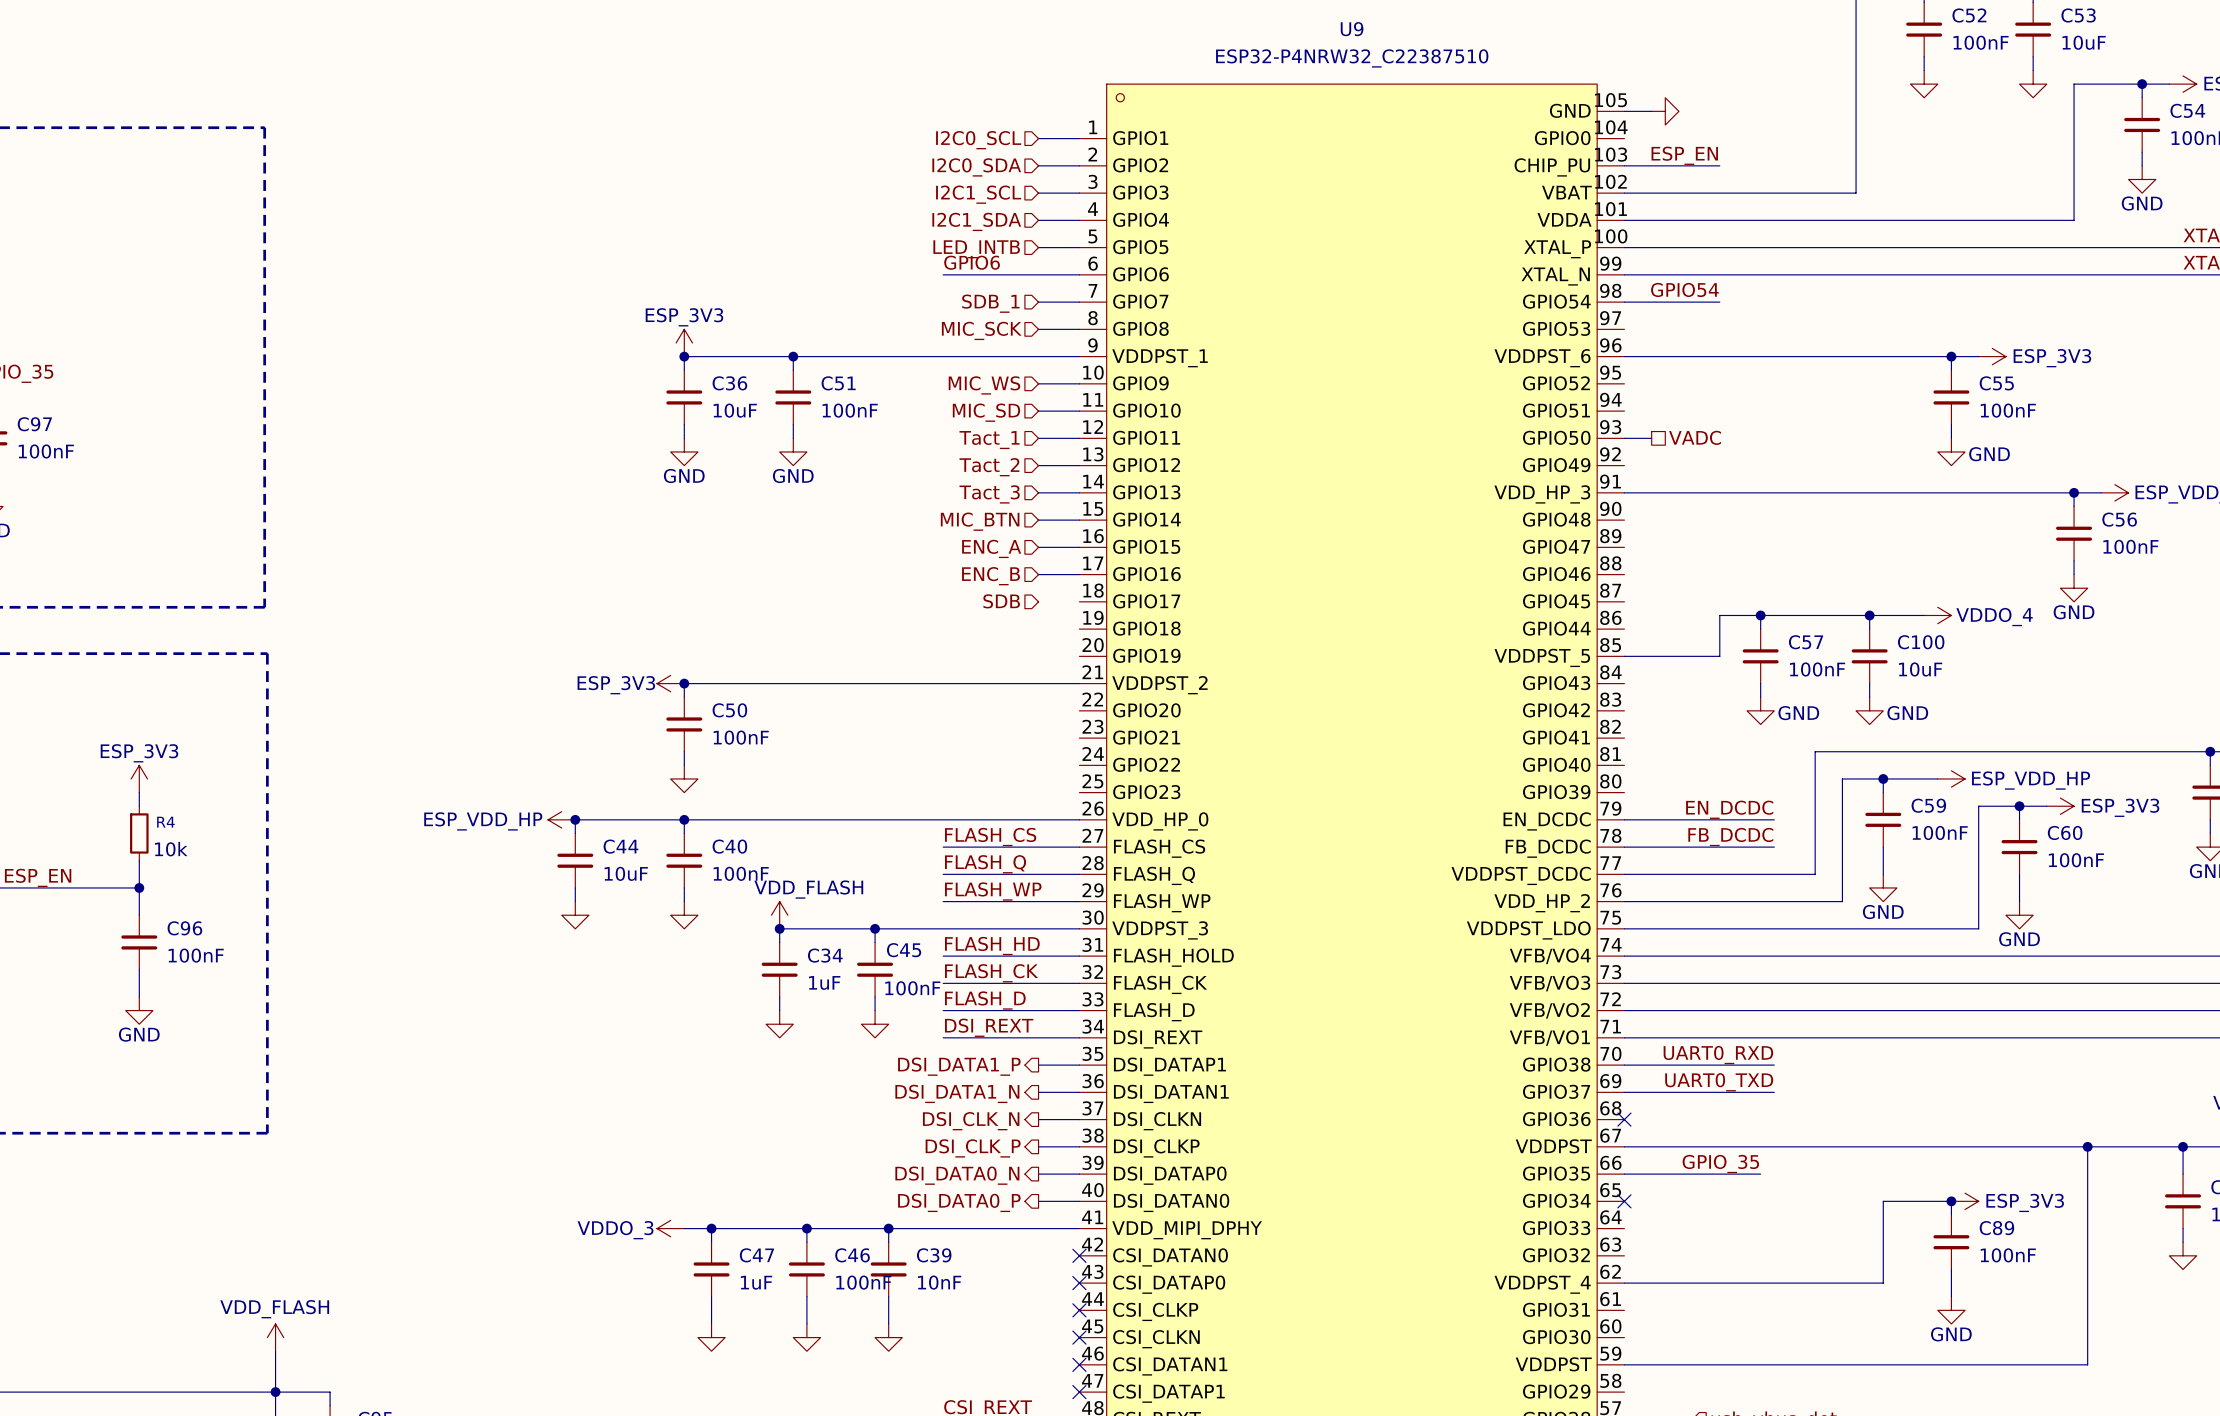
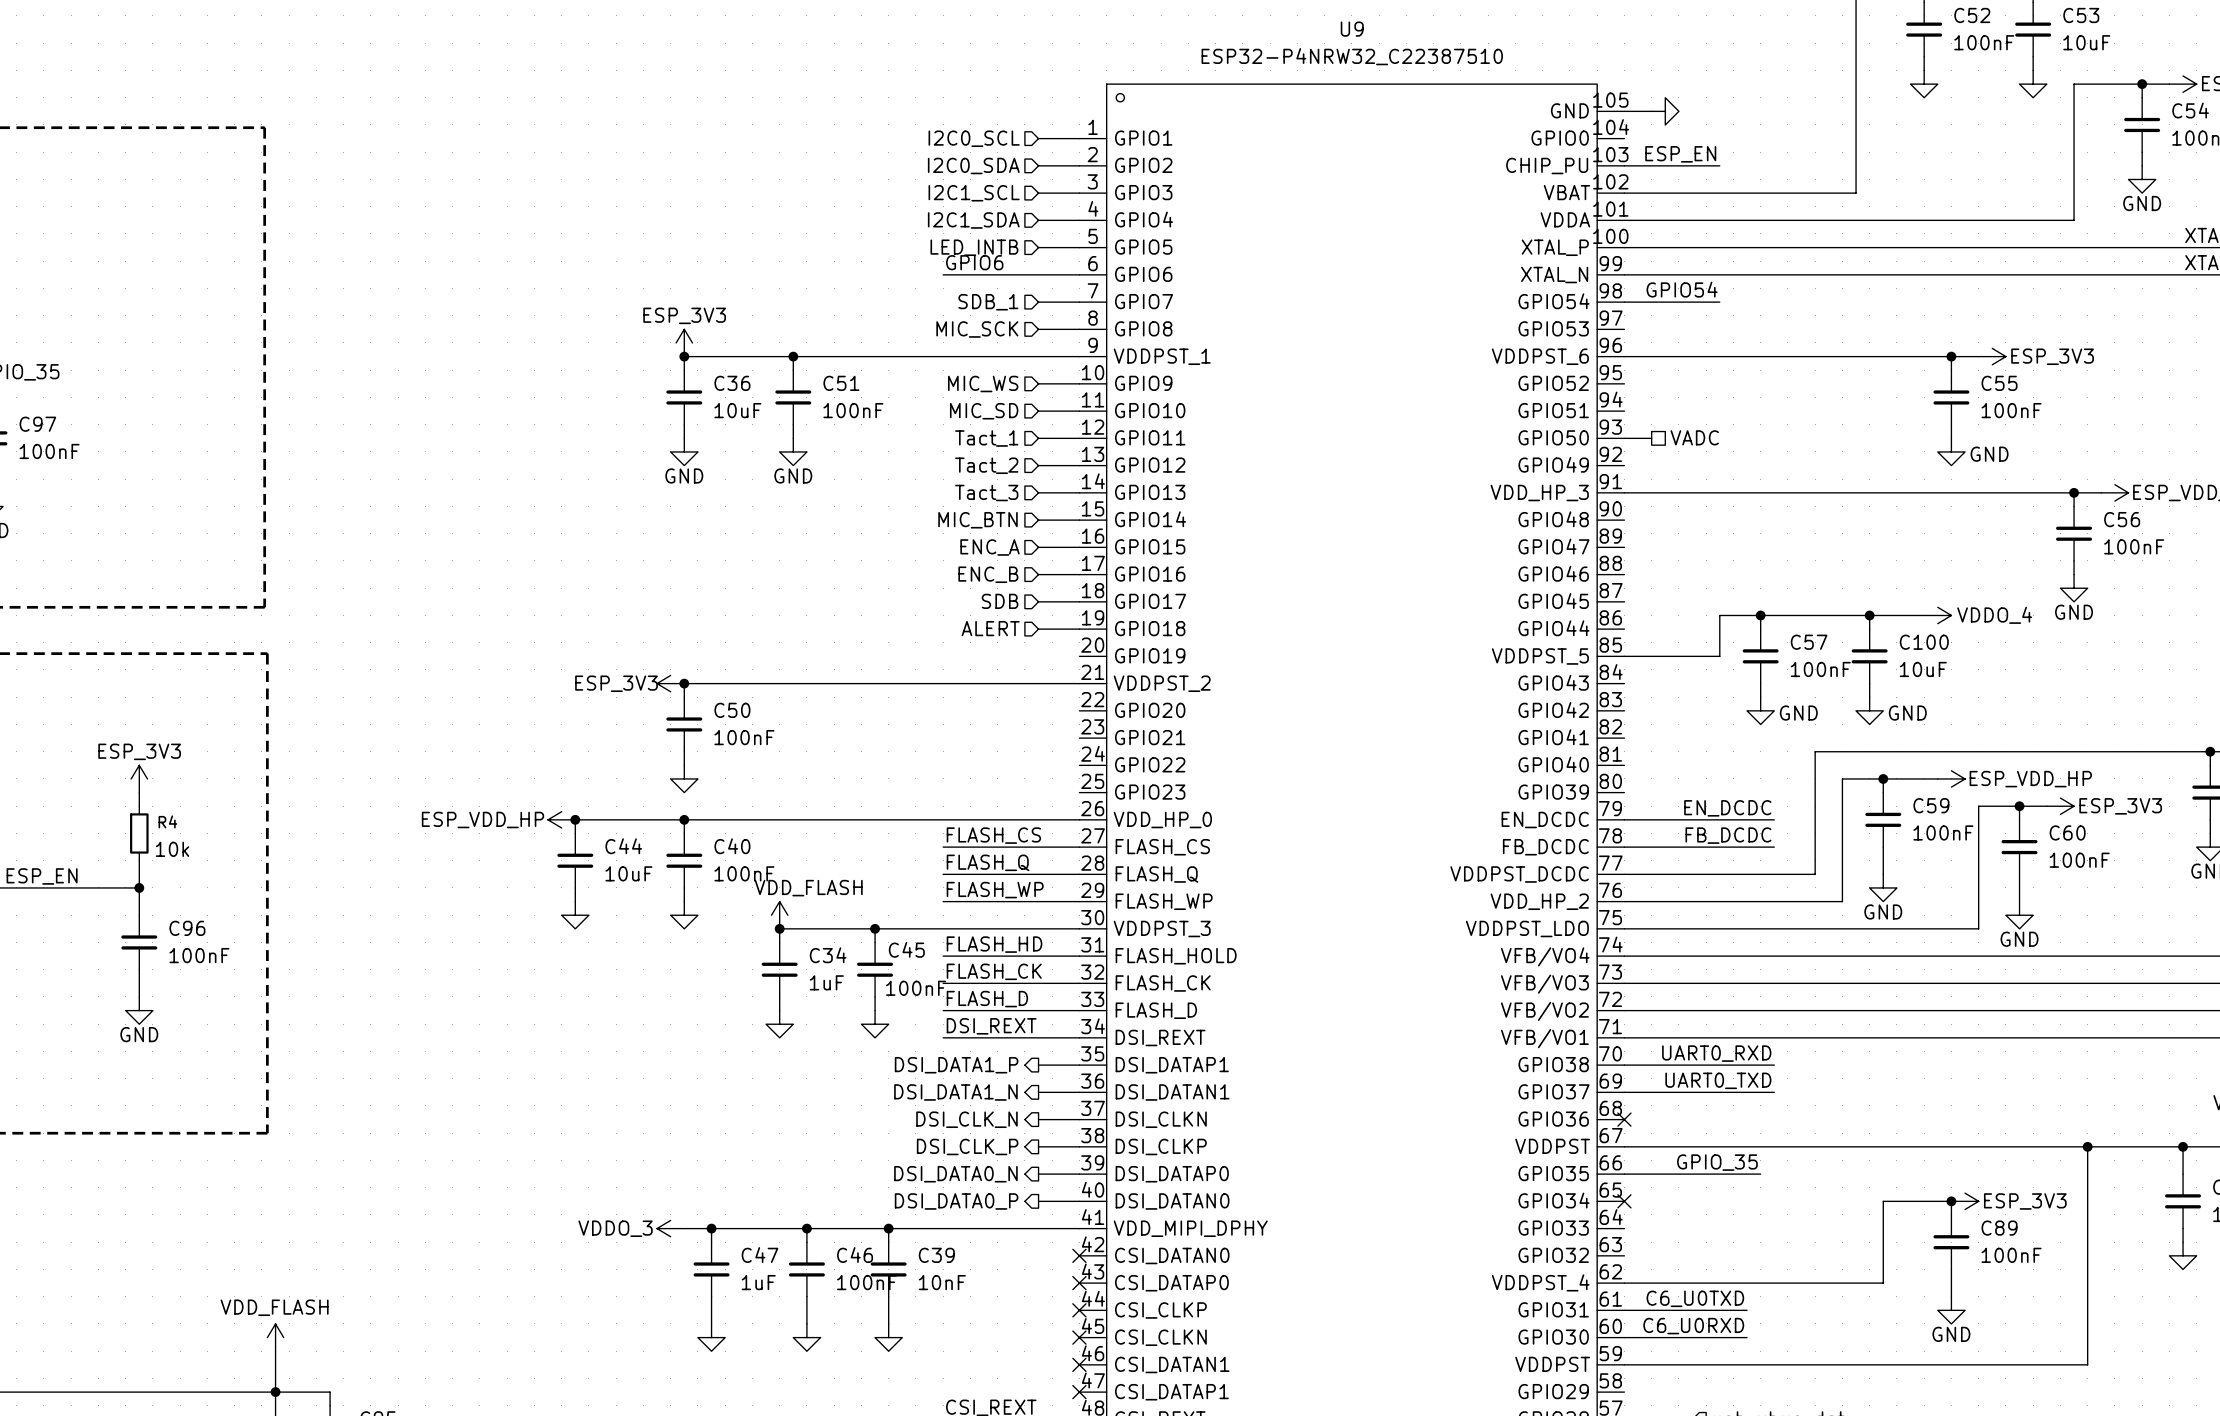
wire: none -> (1038, 601) (1079, 601)
hierarchical label: none -> ALERT (990, 628)
wire: none -> (1038, 629) (1079, 629)
label: none -> C6_U0TXD (1695, 1298)
wire: none -> (1624, 1310) (1747, 1310)
label: none -> C6_U0RXD (1693, 1326)
wire: none -> (1624, 1337) (1747, 1337)

